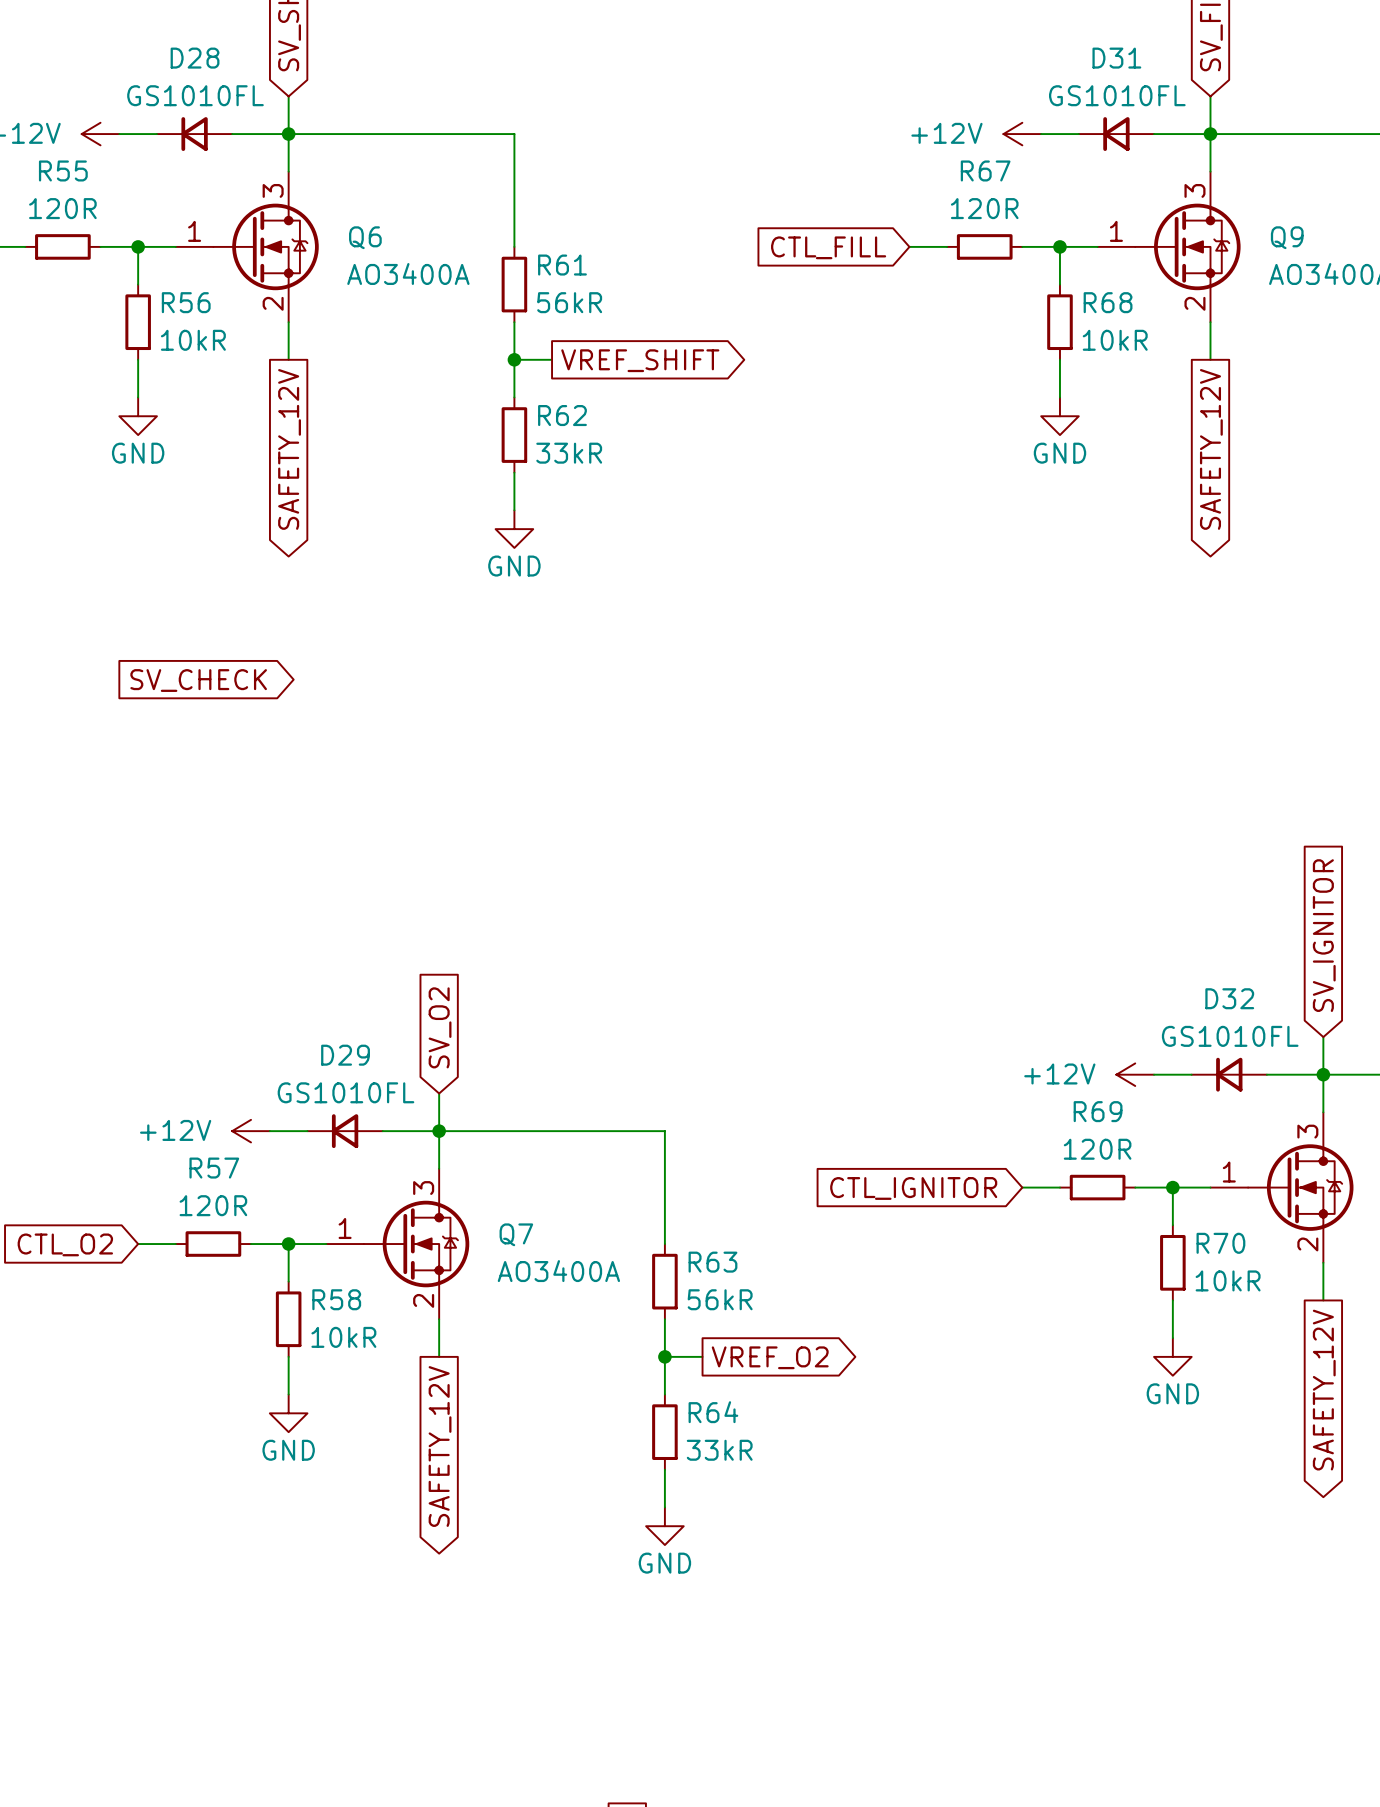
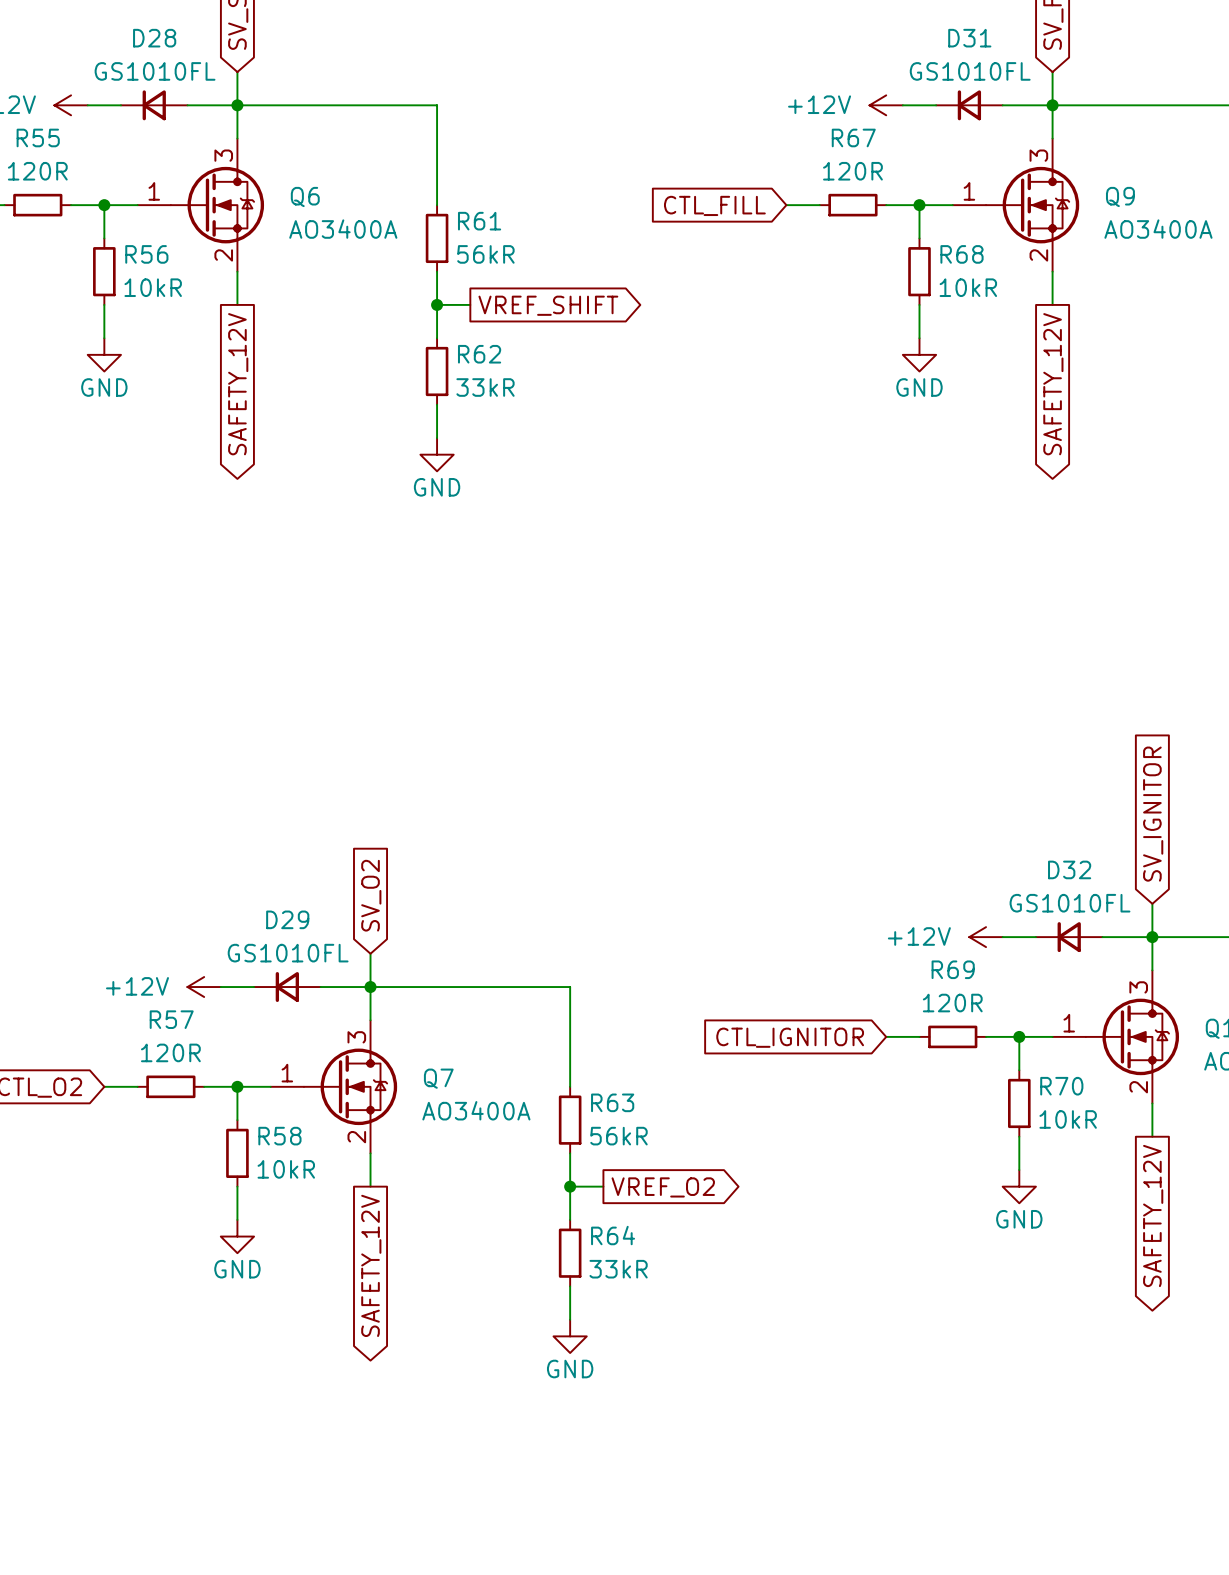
global label: SV_CHECK (198, 680) -> none

